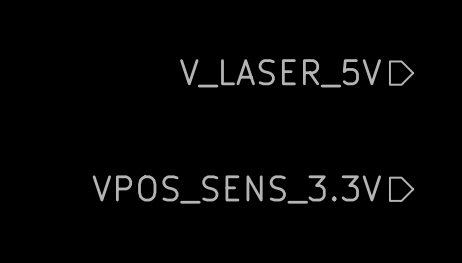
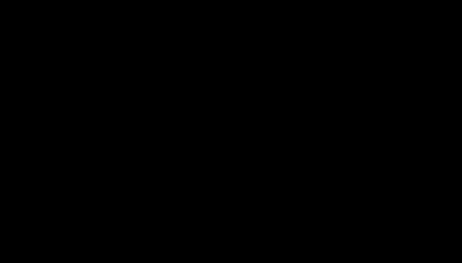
hierarchical label: V_LASER_5V (280, 73) -> none
hierarchical label: VPOS_SENS_3.3V (236, 189) -> none

